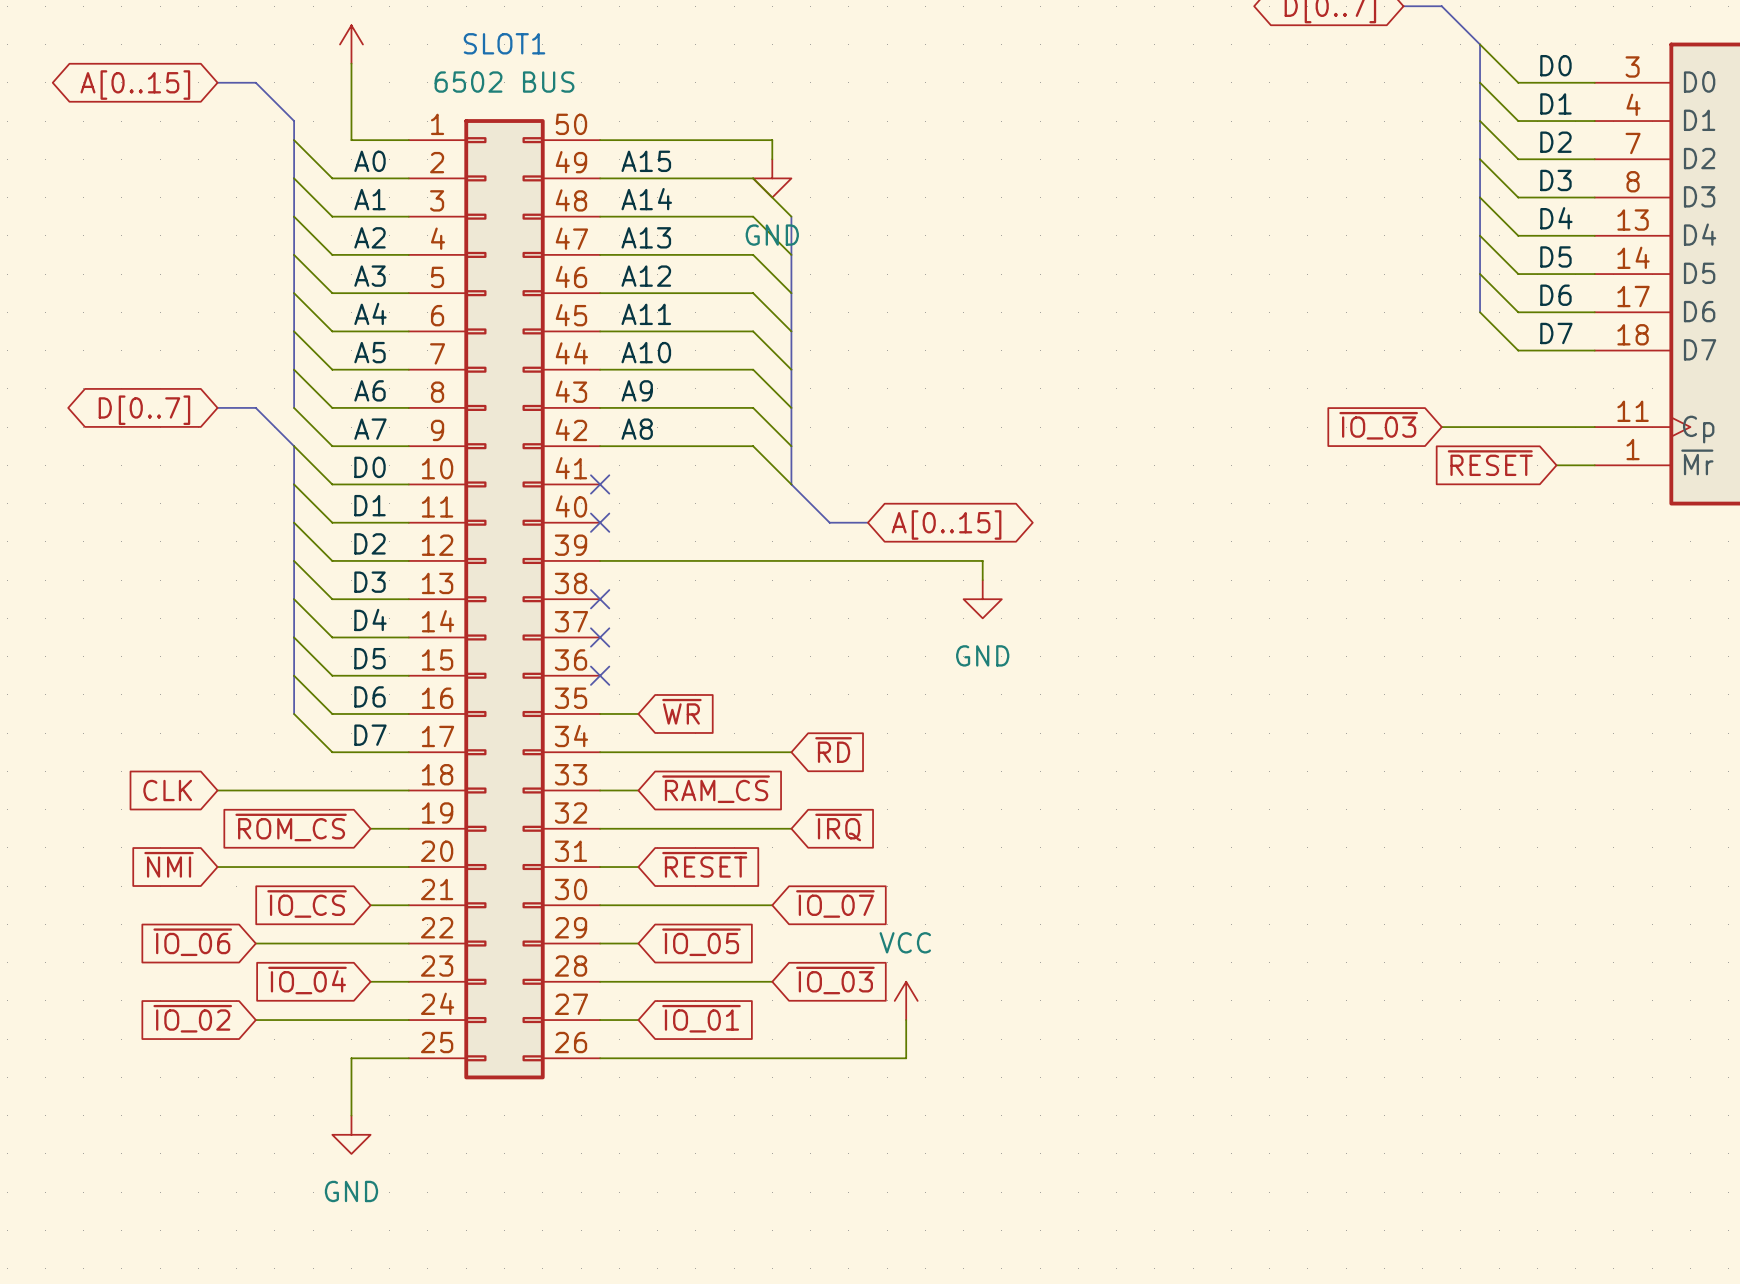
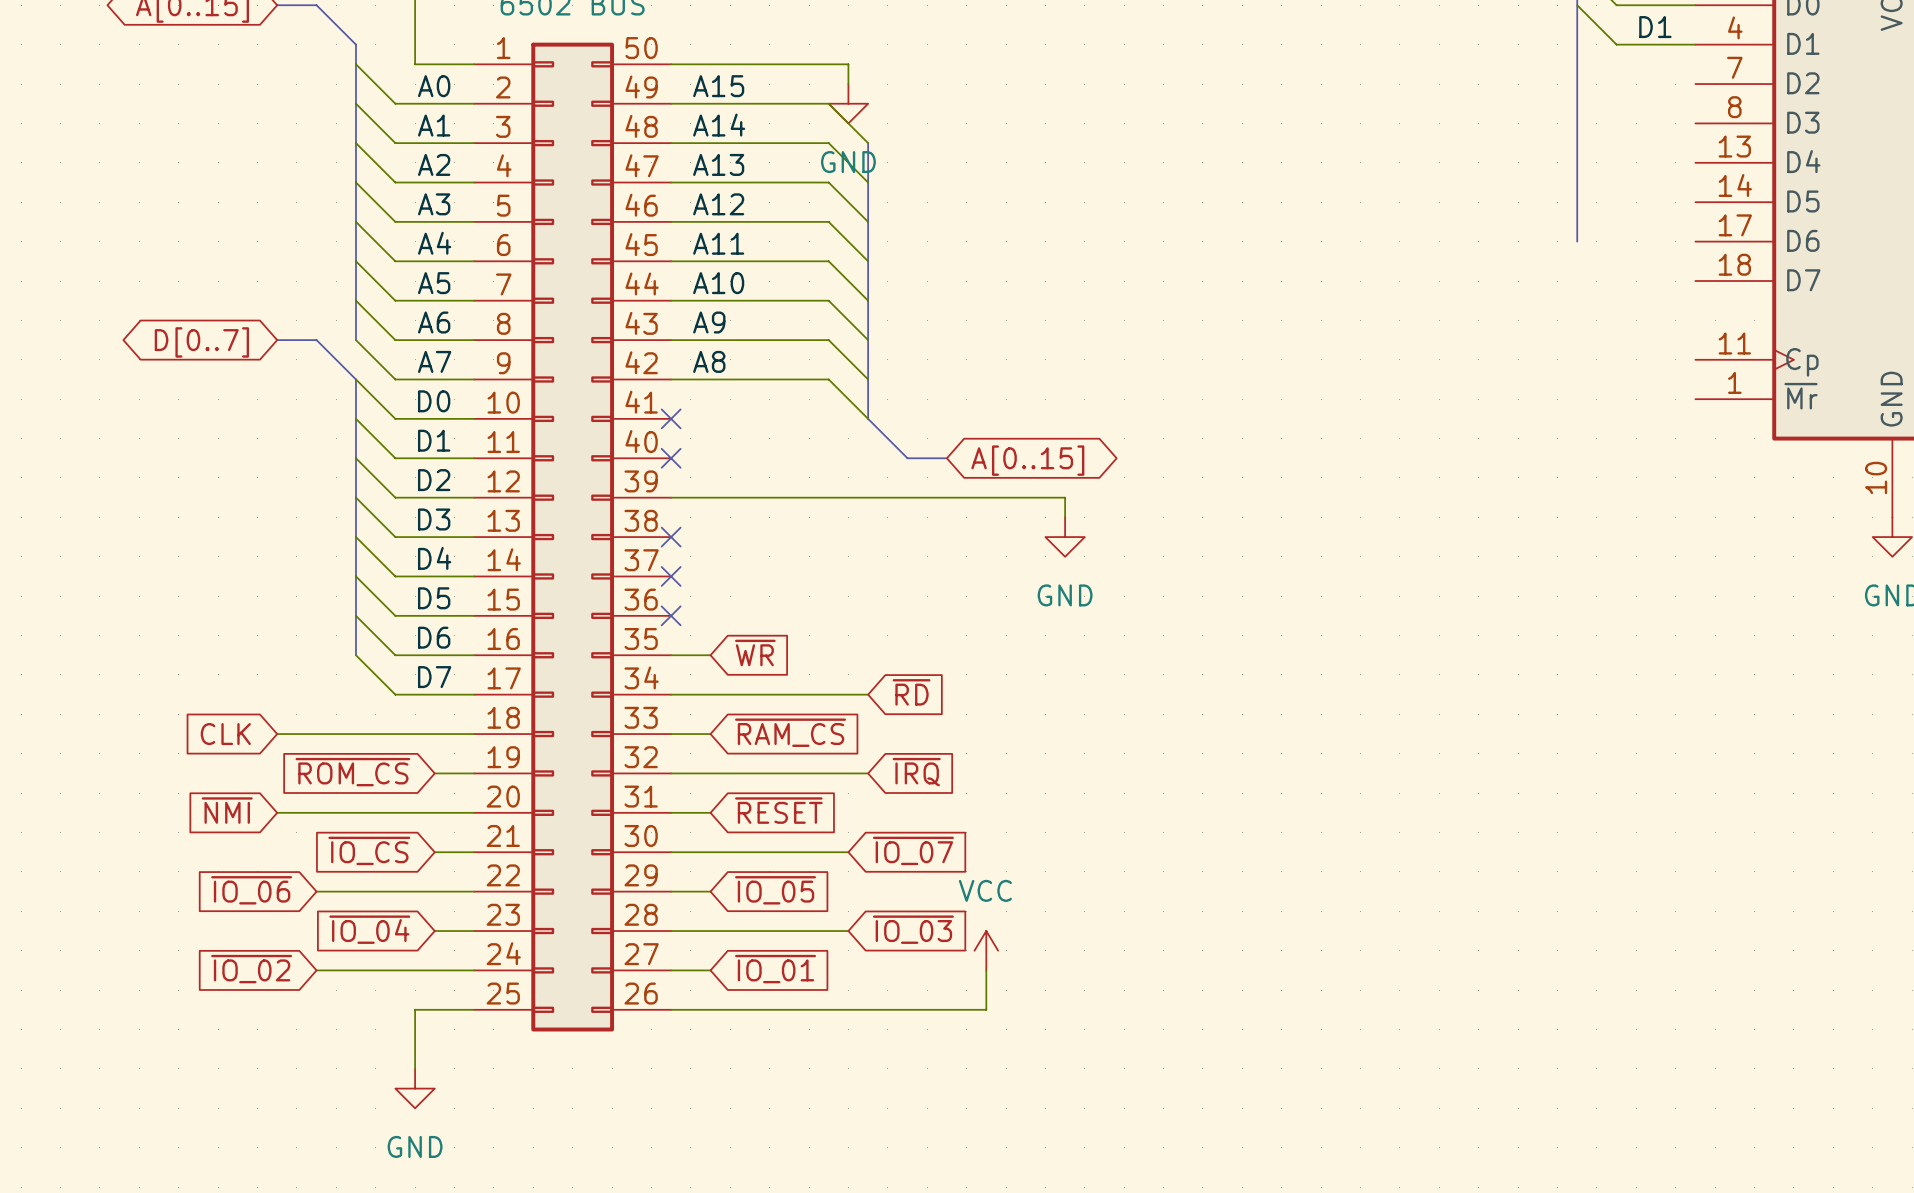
wire: (1480, 121) (1518, 159) (1594, 159) -> none
label: D2 (1555, 142) -> none
wire: (1480, 159) (1518, 197) (1594, 197) -> none
label: D3 (1555, 180) -> none
wire: (1480, 197) (1518, 235) (1594, 235) -> none
label: D4 (1556, 218) -> none
wire: (1480, 235) (1518, 274) (1594, 274) -> none
label: D5 (1555, 256) -> none
wire: (1480, 274) (1518, 312) (1594, 312) -> none
label: D6 (1555, 295) -> none
wire: (1480, 312) (1518, 350) (1594, 350) -> none
label: D7 (1556, 333) -> none
global label: ~{IO_03} (1378, 425) -> none
wire: (1441, 427) (1594, 427) -> none
global label: ~{RESET} (1490, 463) -> none
wire: (1556, 465) (1594, 465) -> none

